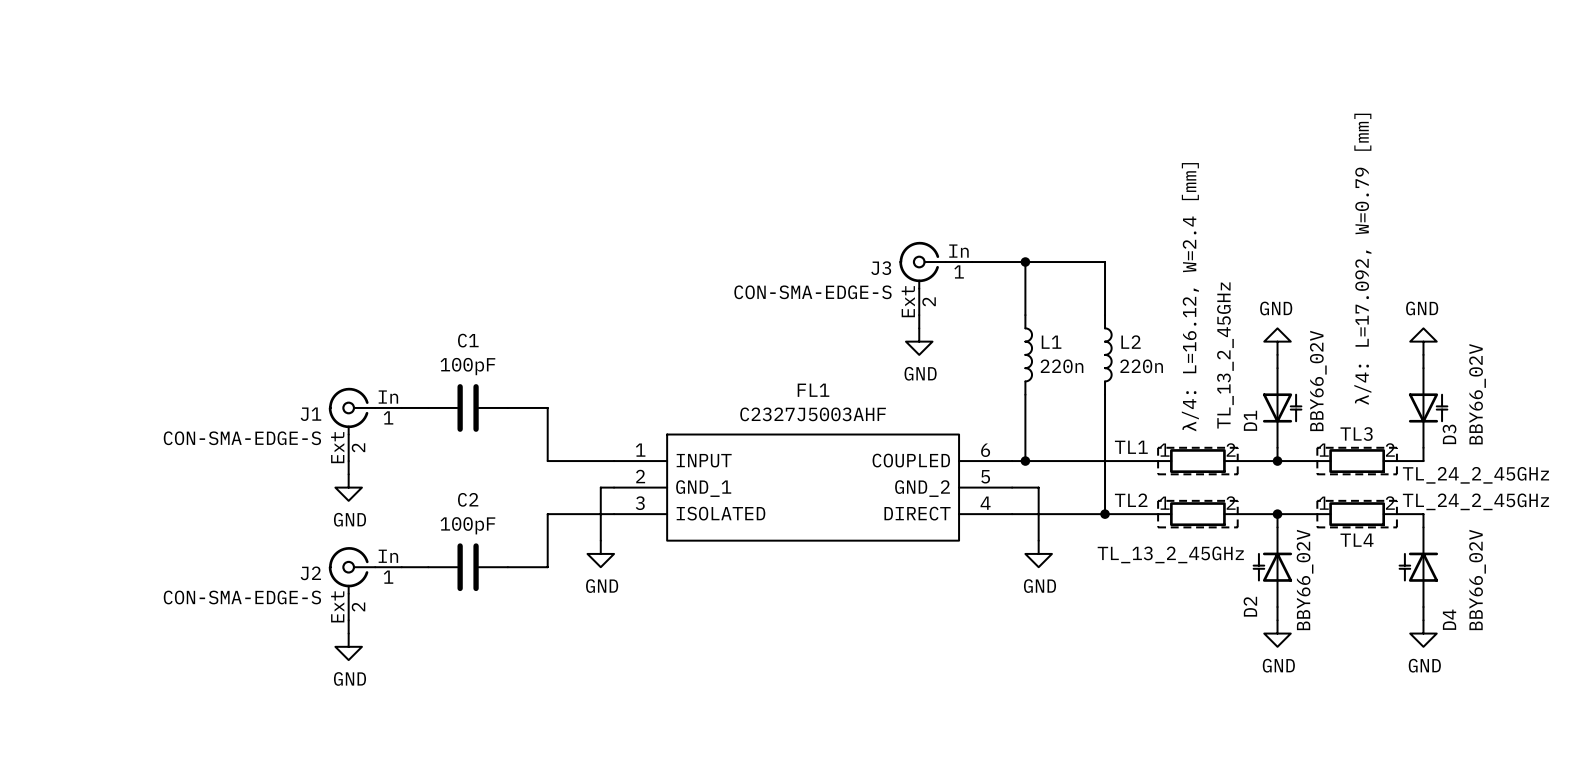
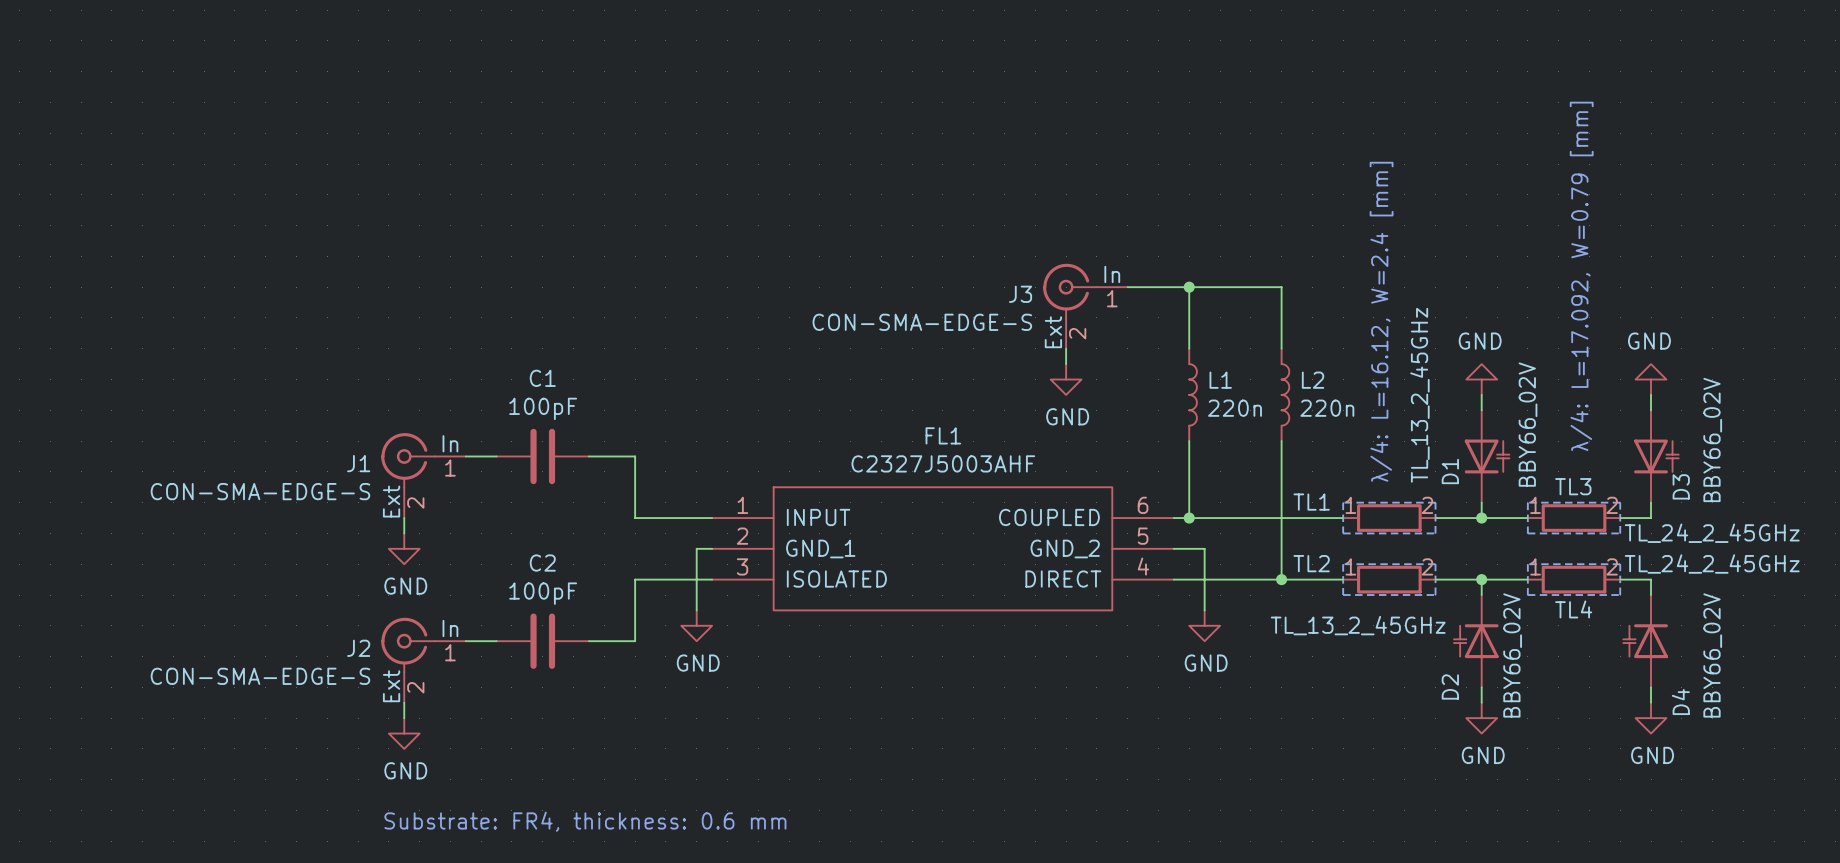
text: none -> Substrate: FR4, thickness: 0.6 mm (585, 821)

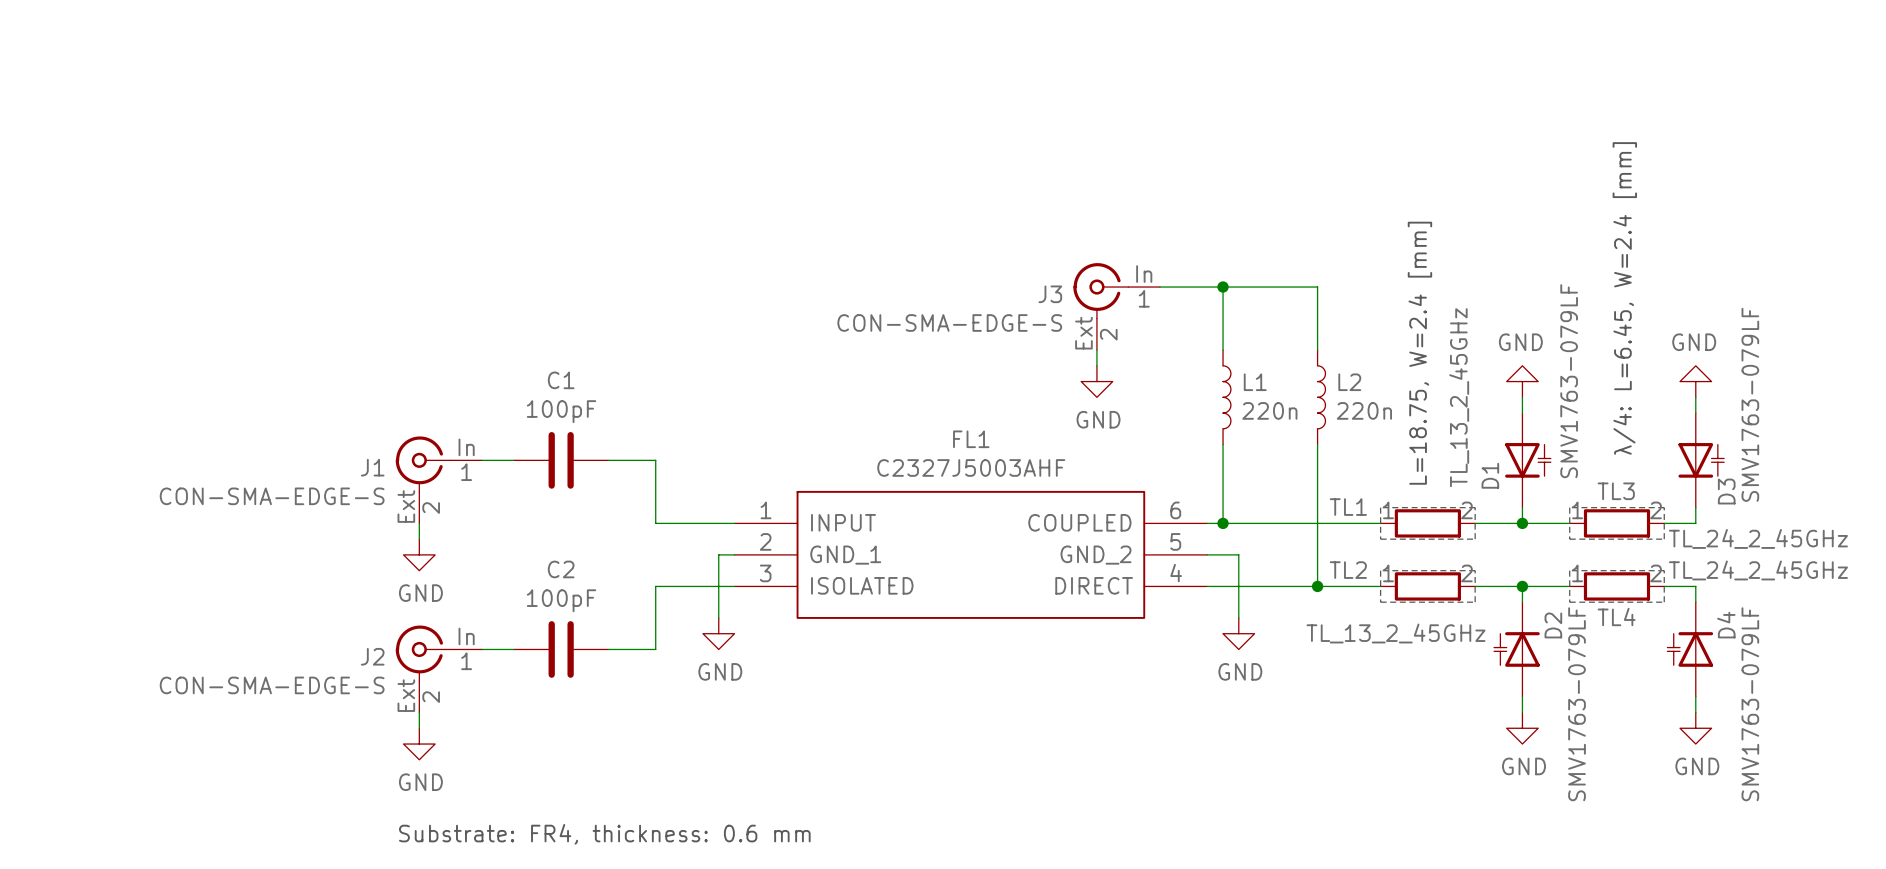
text: λ/4: L=17.092, W=0.79 [mm] (1581, 276) -> λ/4: L=6.45, W=2.4 [mm] (1624, 298)
text: λ/4: L=16.12, W=2.4 [mm] (1381, 321) -> L=18.75, W=2.4 [mm] (1419, 353)
D1 value: BBY66_02V (1528, 424) -> SMV1763-079LF (1569, 381)
D3 value: BBY66_02V (1712, 439) -> SMV1763-079LF (1750, 404)
D2 value: BBY66_02V (1512, 655) -> SMV1763-079LF (1577, 704)
D4 value: BBY66_02V (1712, 655) -> SMV1763-079LF (1750, 704)
D2 name position: D2 (1450, 686) -> D2 (1553, 625)
D4 name position: D4 (1680, 702) -> D4 (1726, 625)

